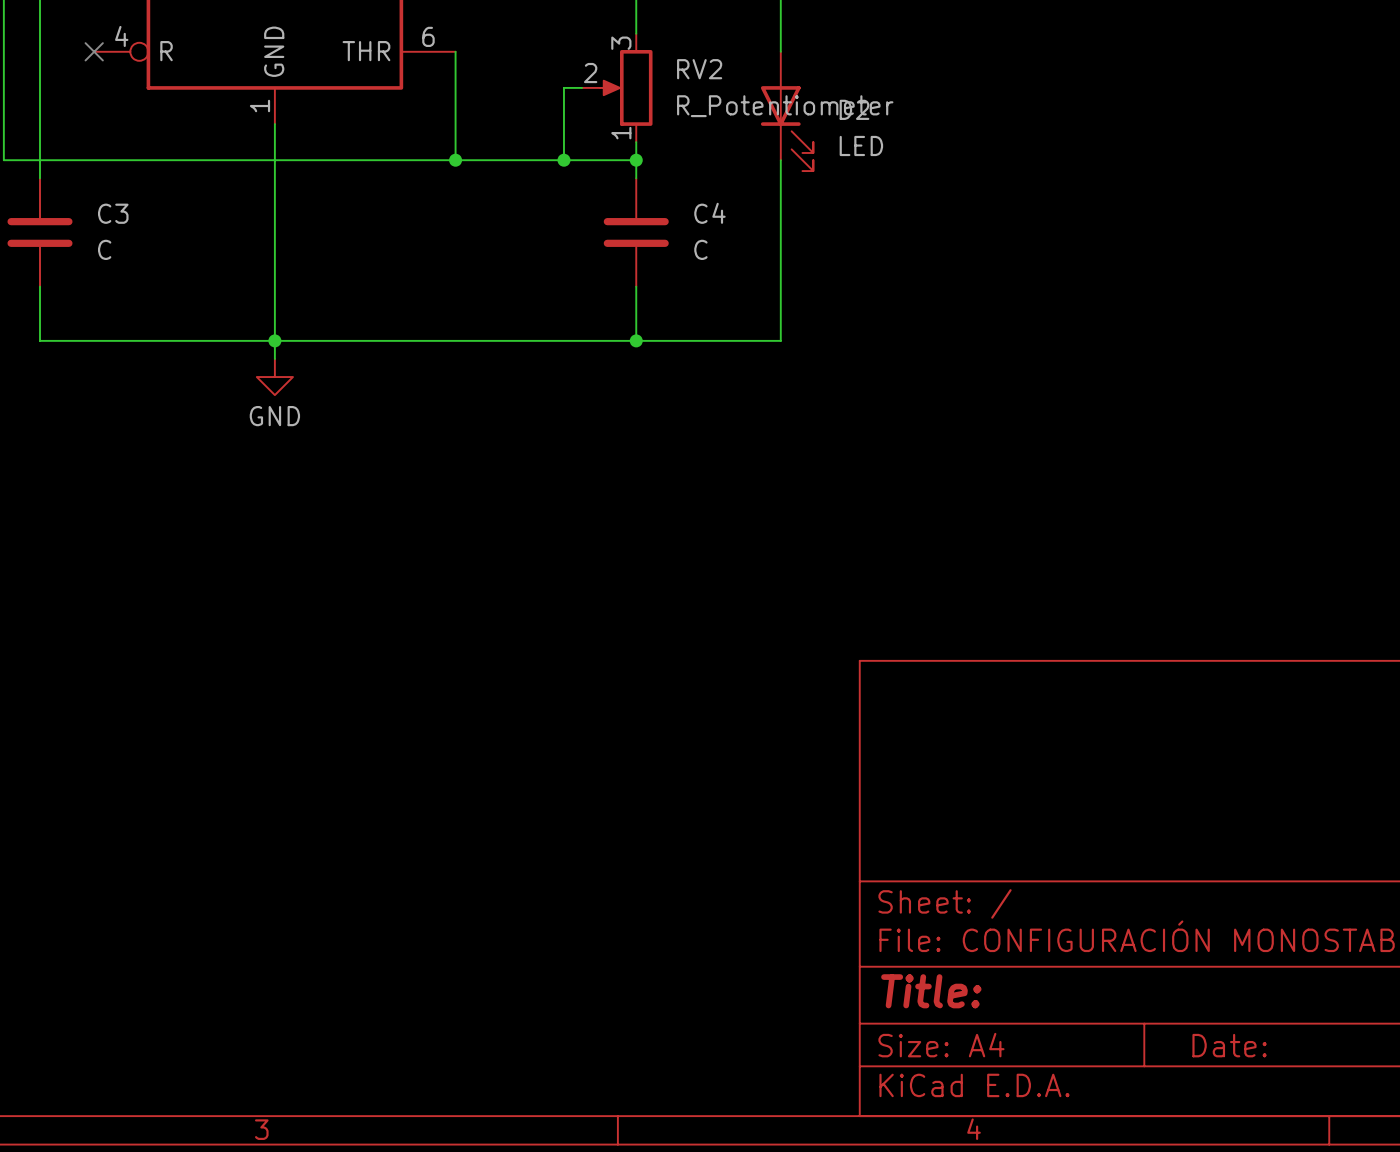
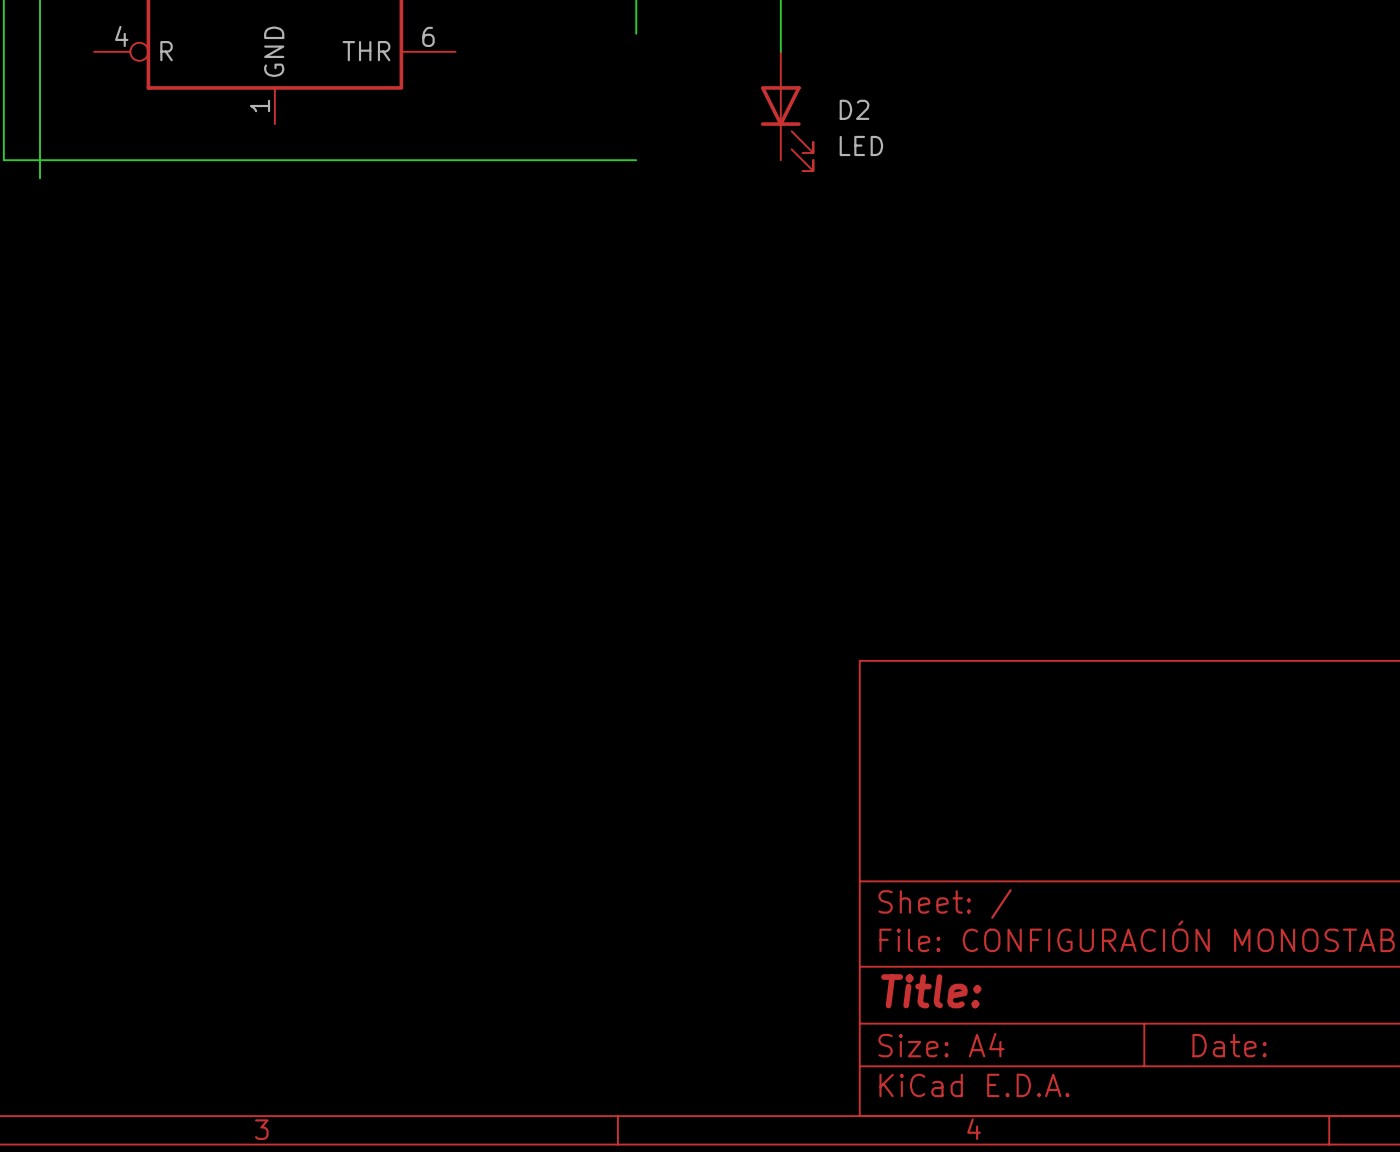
no-connect mark: (94, 51) -> none
wire: (455, 51) (455, 160) -> none
wire: (582, 87) (563, 87) (563, 160) -> none
RV2: R_Potentiometer (617, 87) -> none
wire: (274, 124) (274, 358) -> none
wire: (636, 142) (636, 178) -> none
junction: (455, 160) -> none
junction: (563, 160) -> none
junction: (636, 160) -> none
wire: (780, 160) (780, 340) (40, 340) (40, 286) -> none
C3: C (40, 232) -> none
C4: C (636, 232) -> none
wire: (636, 286) (636, 340) -> none
junction: (274, 340) -> none
junction: (636, 340) -> none
power symbol: GND (274, 377) -> none

